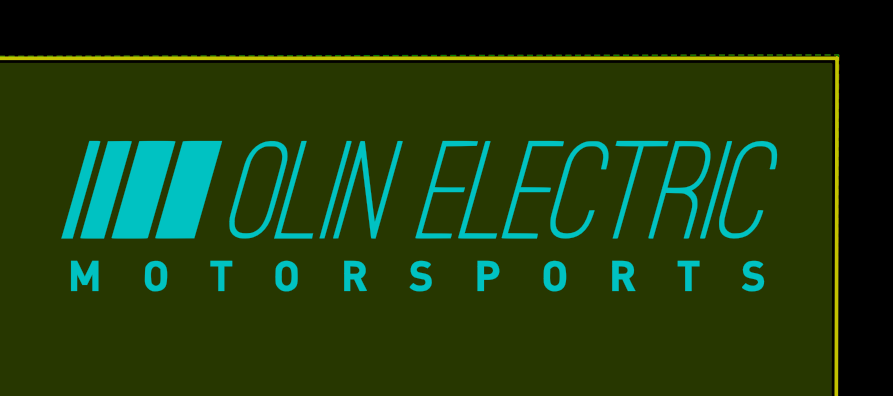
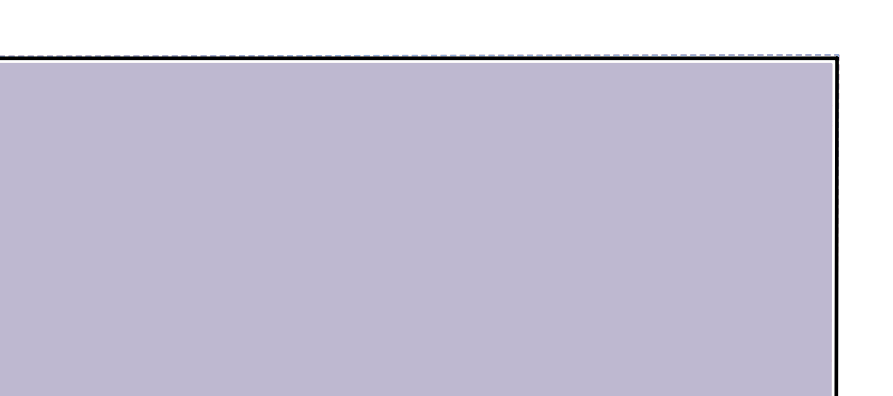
drawing: [61, 140, 778, 292] -> none

